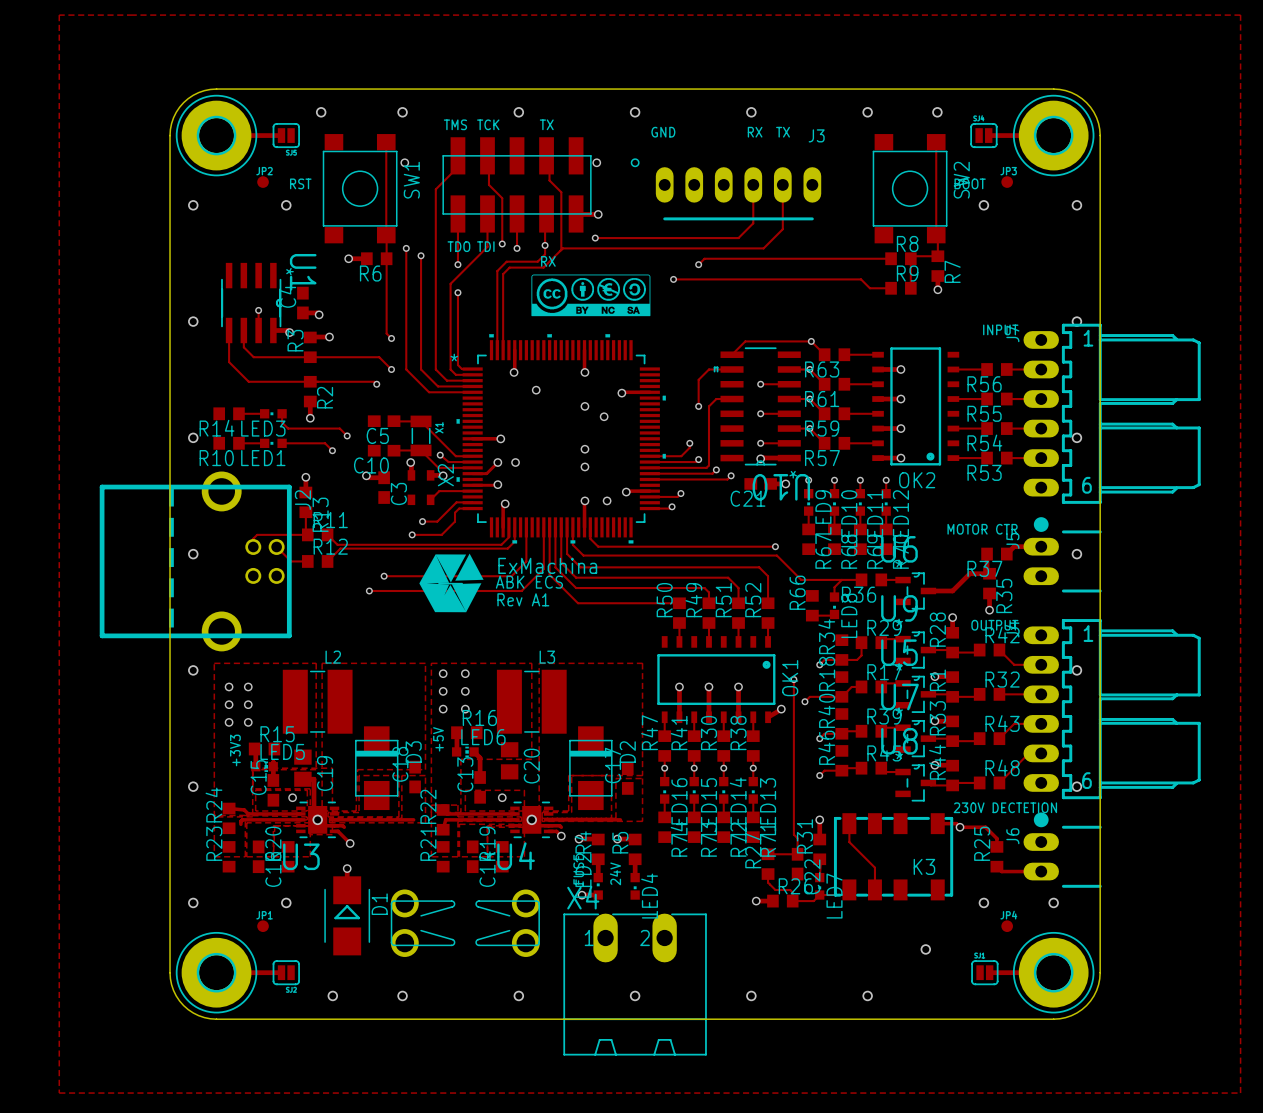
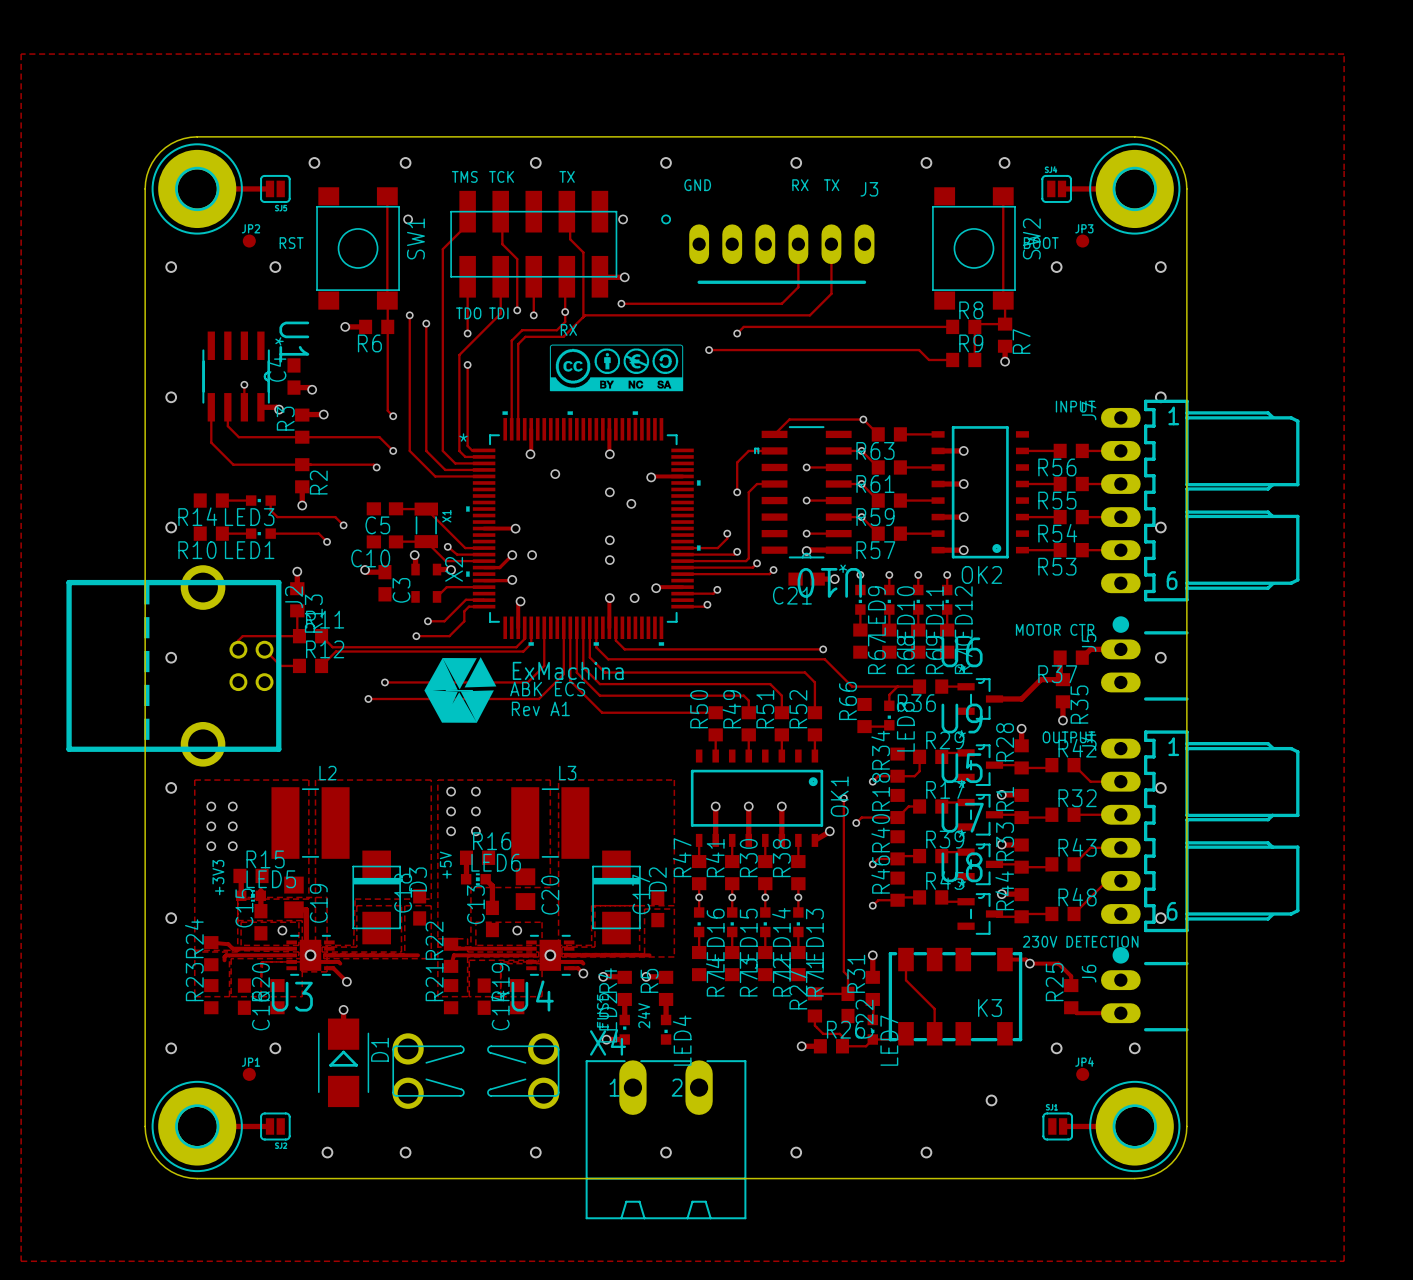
text: 230V DECTETION (1005, 807) -> 230V DETECTION (1080, 941)

